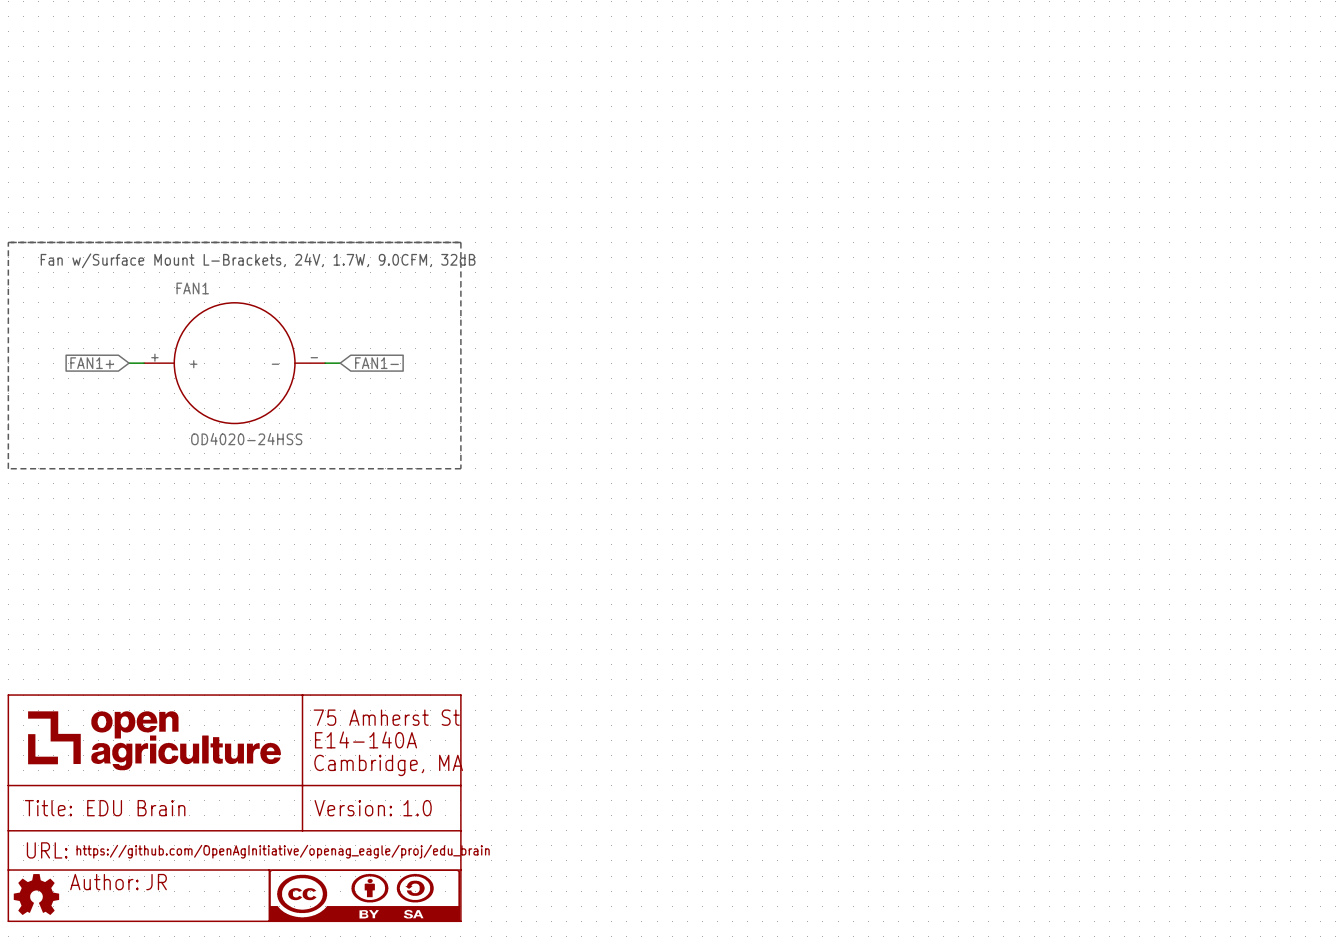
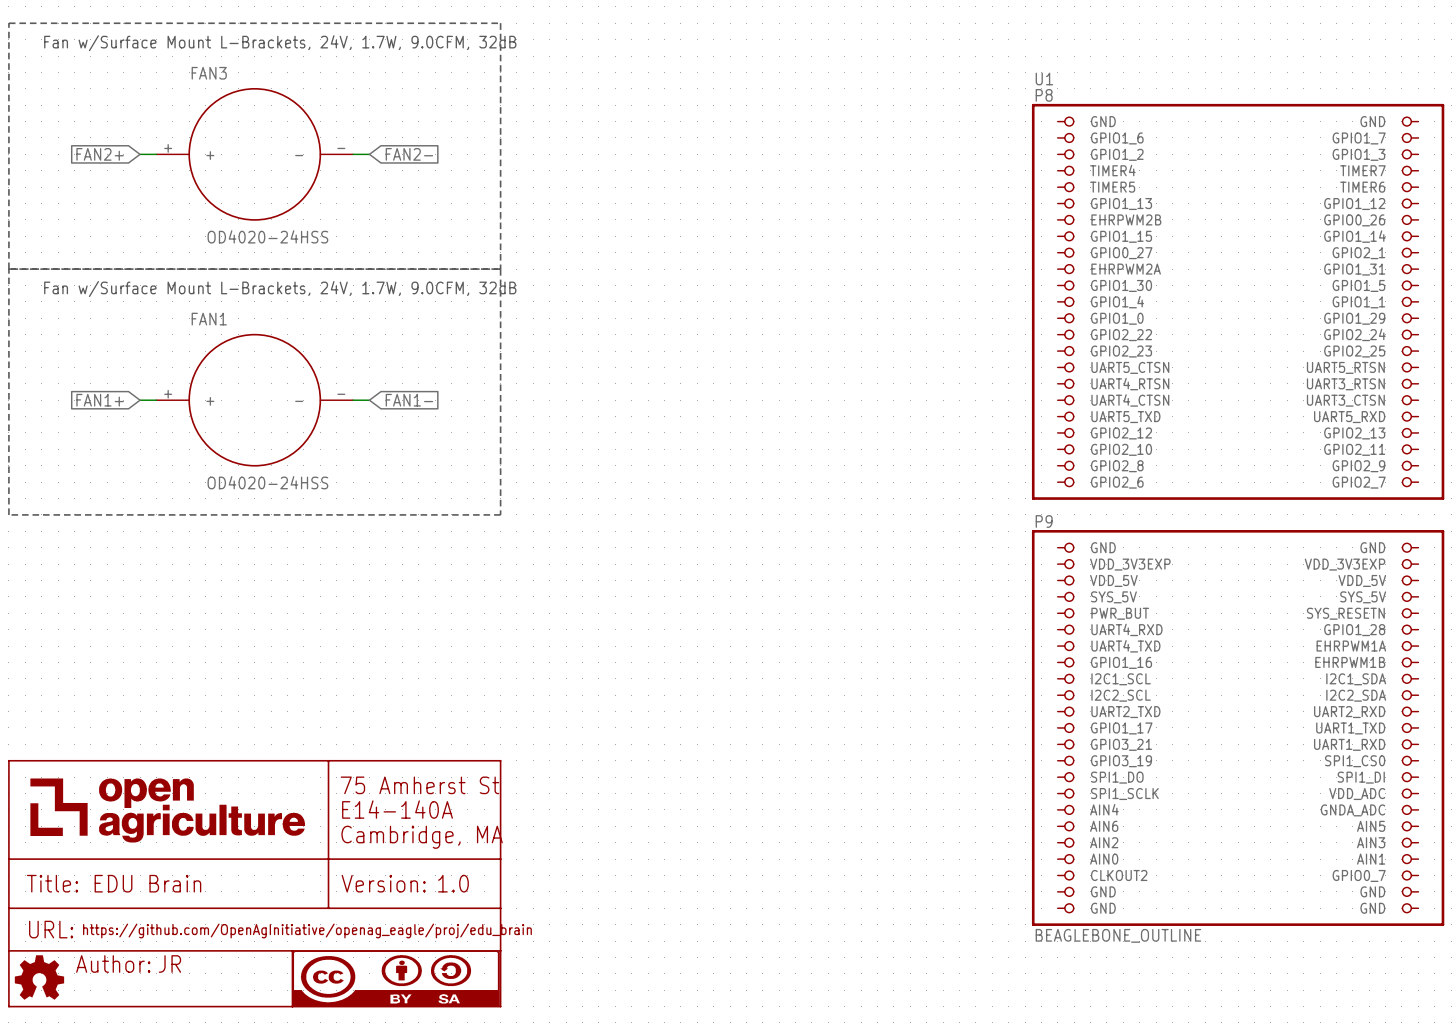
text: none -> Fan w/Surface Mount L-Brackets, 24V, 1.7W, 9.0CFM, 32dB (280, 43)
global label: none -> FAN2+ (100, 154)
wire: none -> (140, 154) (156, 154)
FAN3: none -> OD4020-24HSS (254, 154)
wire: none -> (353, 154) (369, 154)
global label: none -> FAN2- (409, 154)
line: none -> (8, 269) (8, 23) (500, 23) (500, 269)
U1: none -> BEAGLEBONE_OUTLINE (1238, 514)

